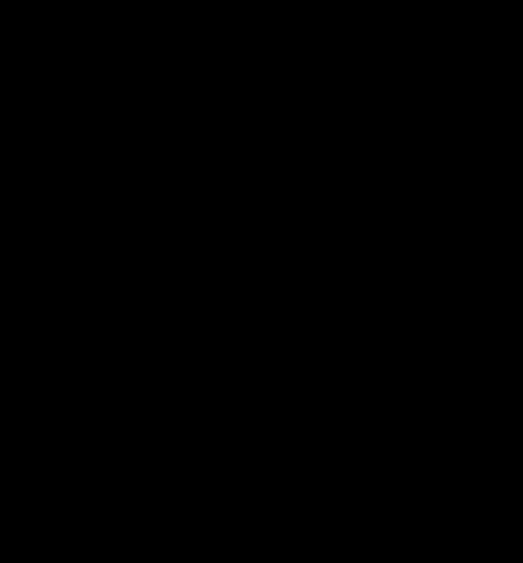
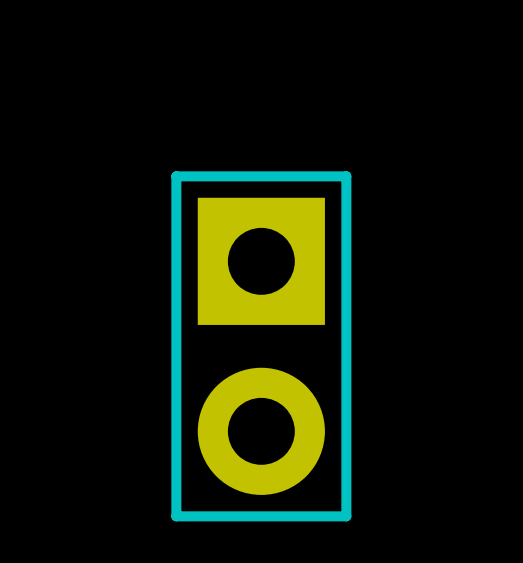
part: none -> (261, 346)

